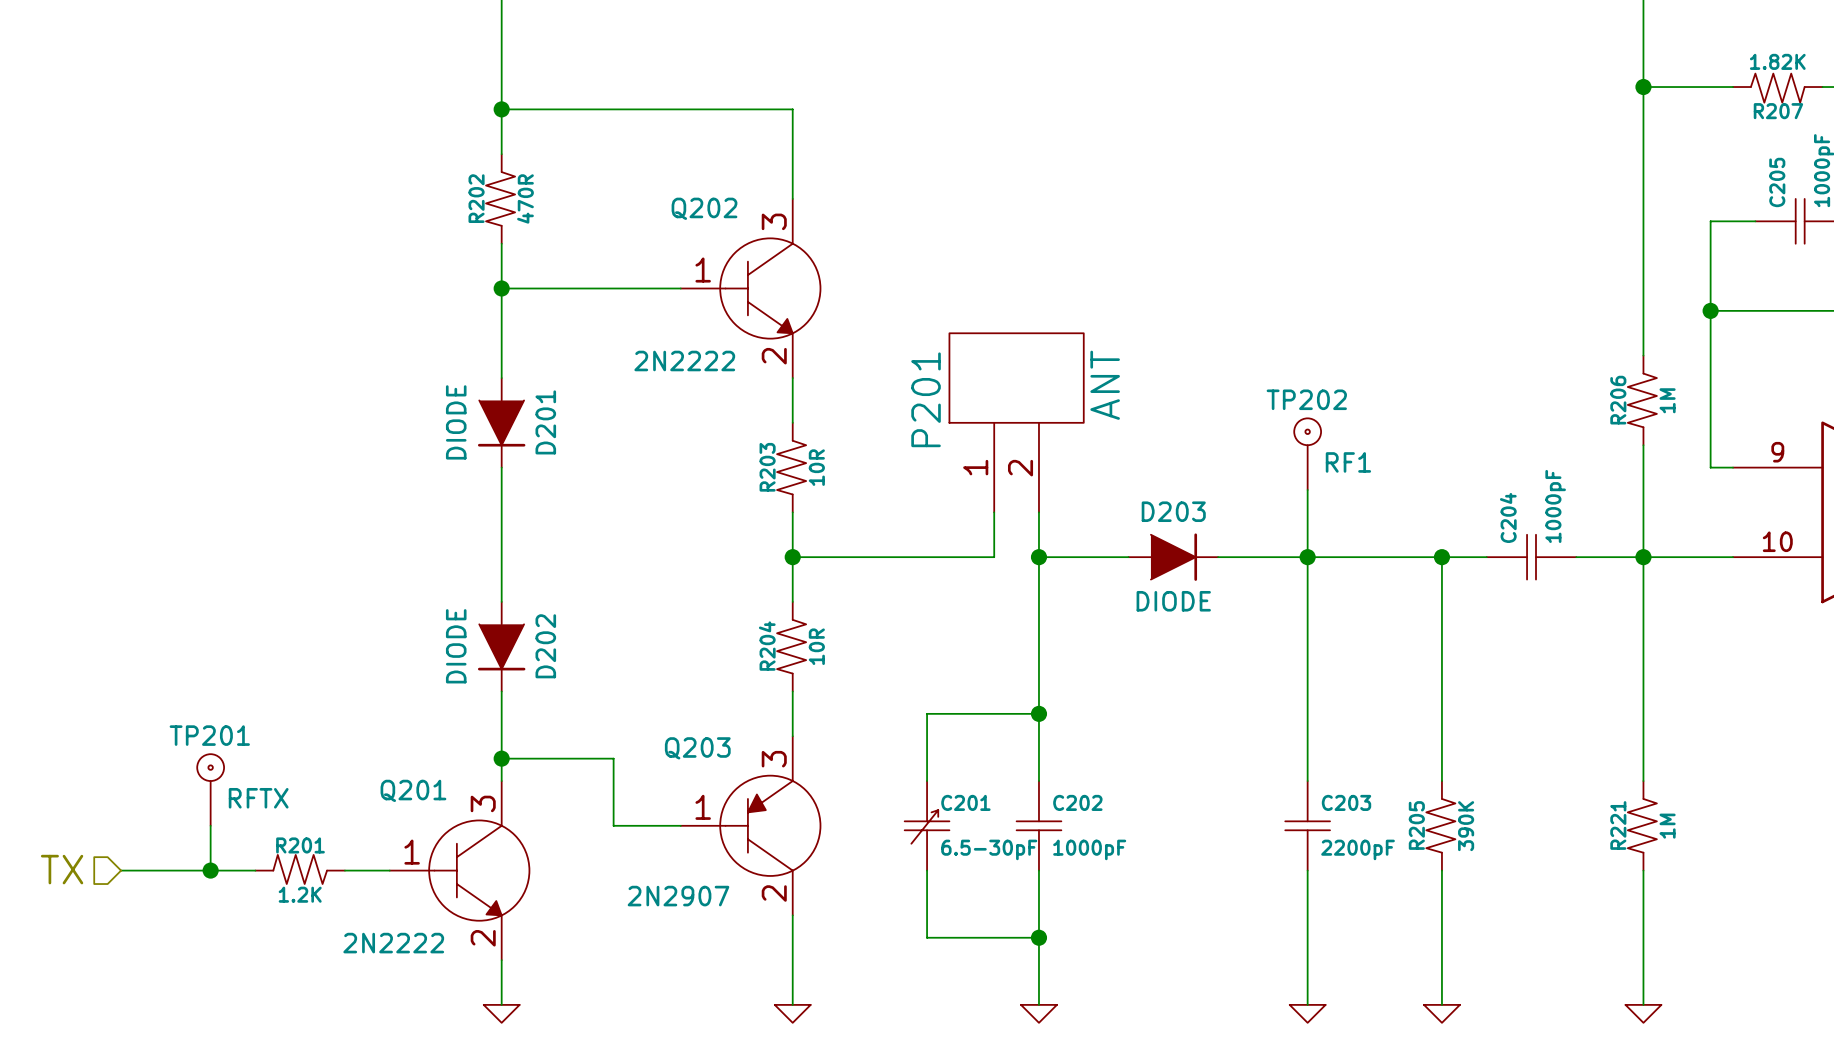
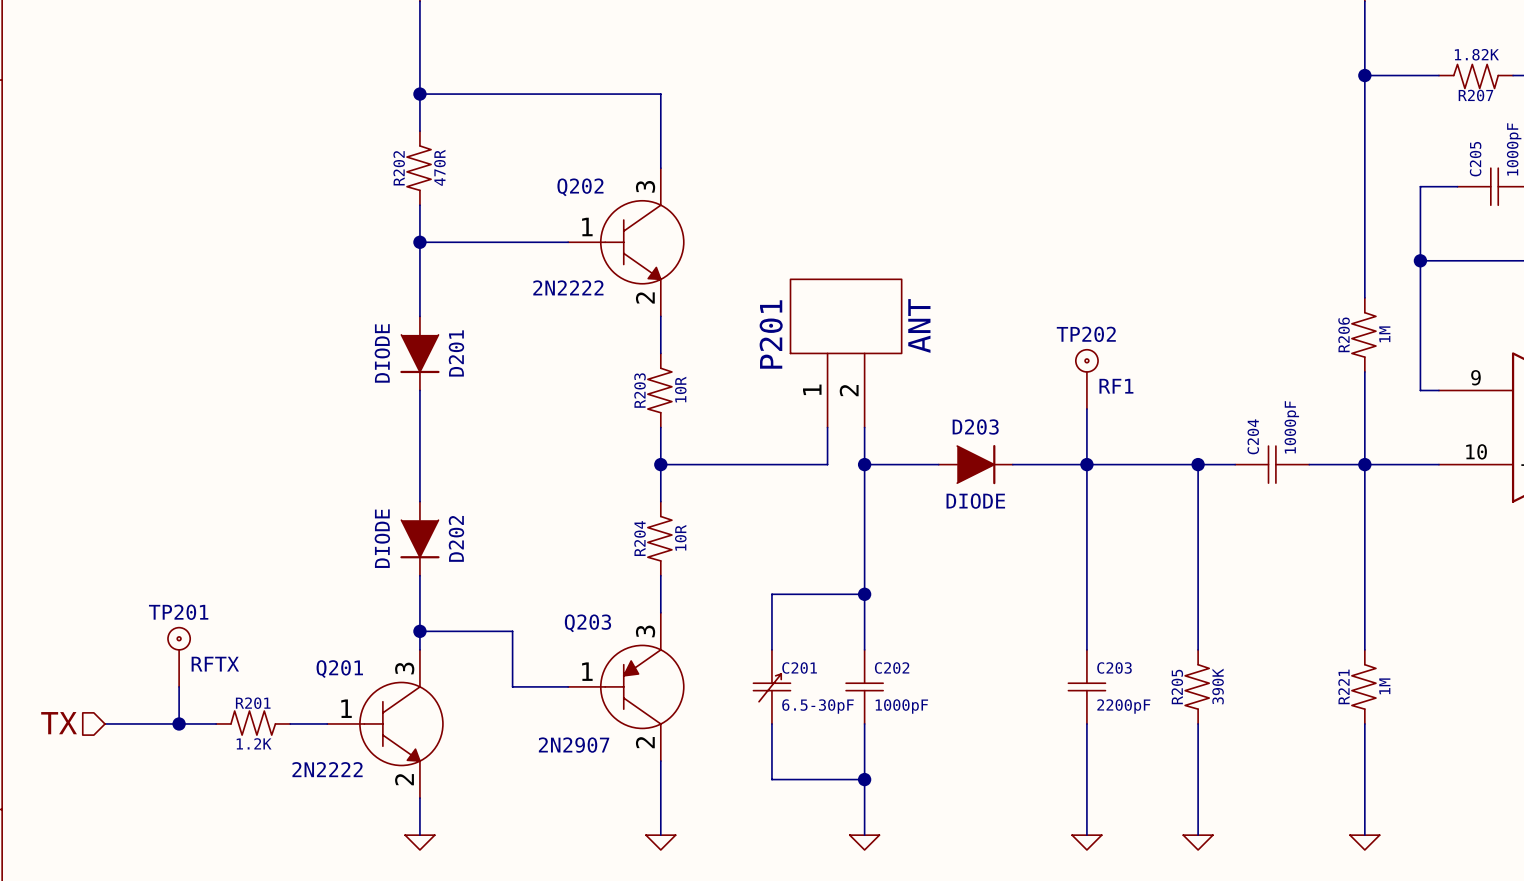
Q202 name position: Q202 (704, 208) -> Q202 (580, 187)
Q202 value position: 2N2222 (684, 360) -> 2N2222 (568, 287)
Q201 name position: Q201 (413, 790) -> Q201 (339, 669)
Q201 value position: 2N2222 (393, 943) -> 2N2222 (327, 769)

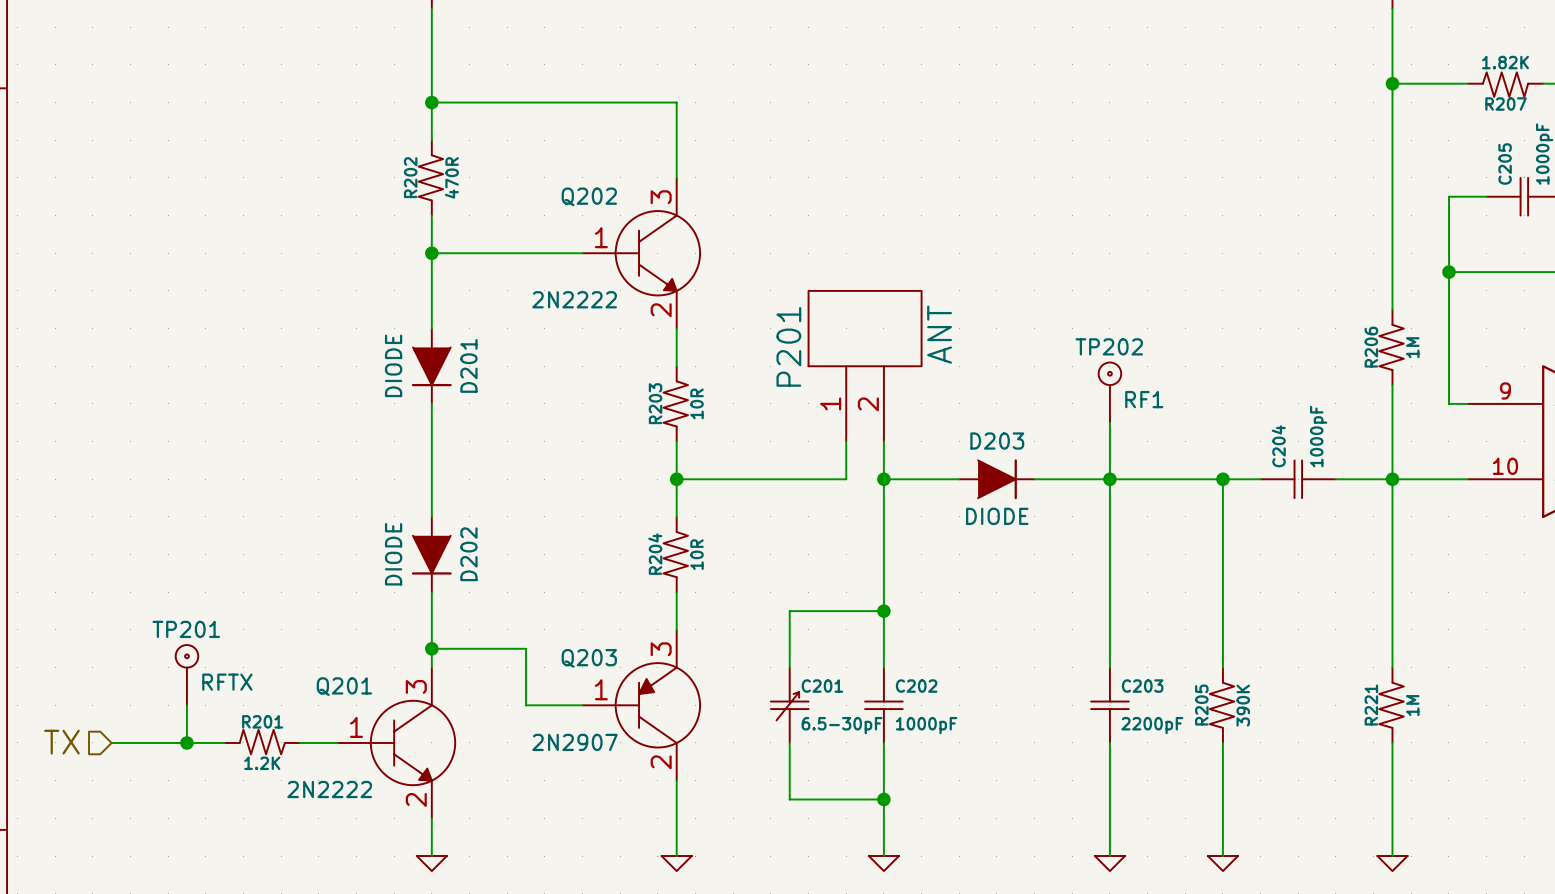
Q203 name position: Q203 (587, 623) -> Q203 (589, 658)
Q203 value position: 2N2907 (574, 745) -> 2N2907 (574, 742)

